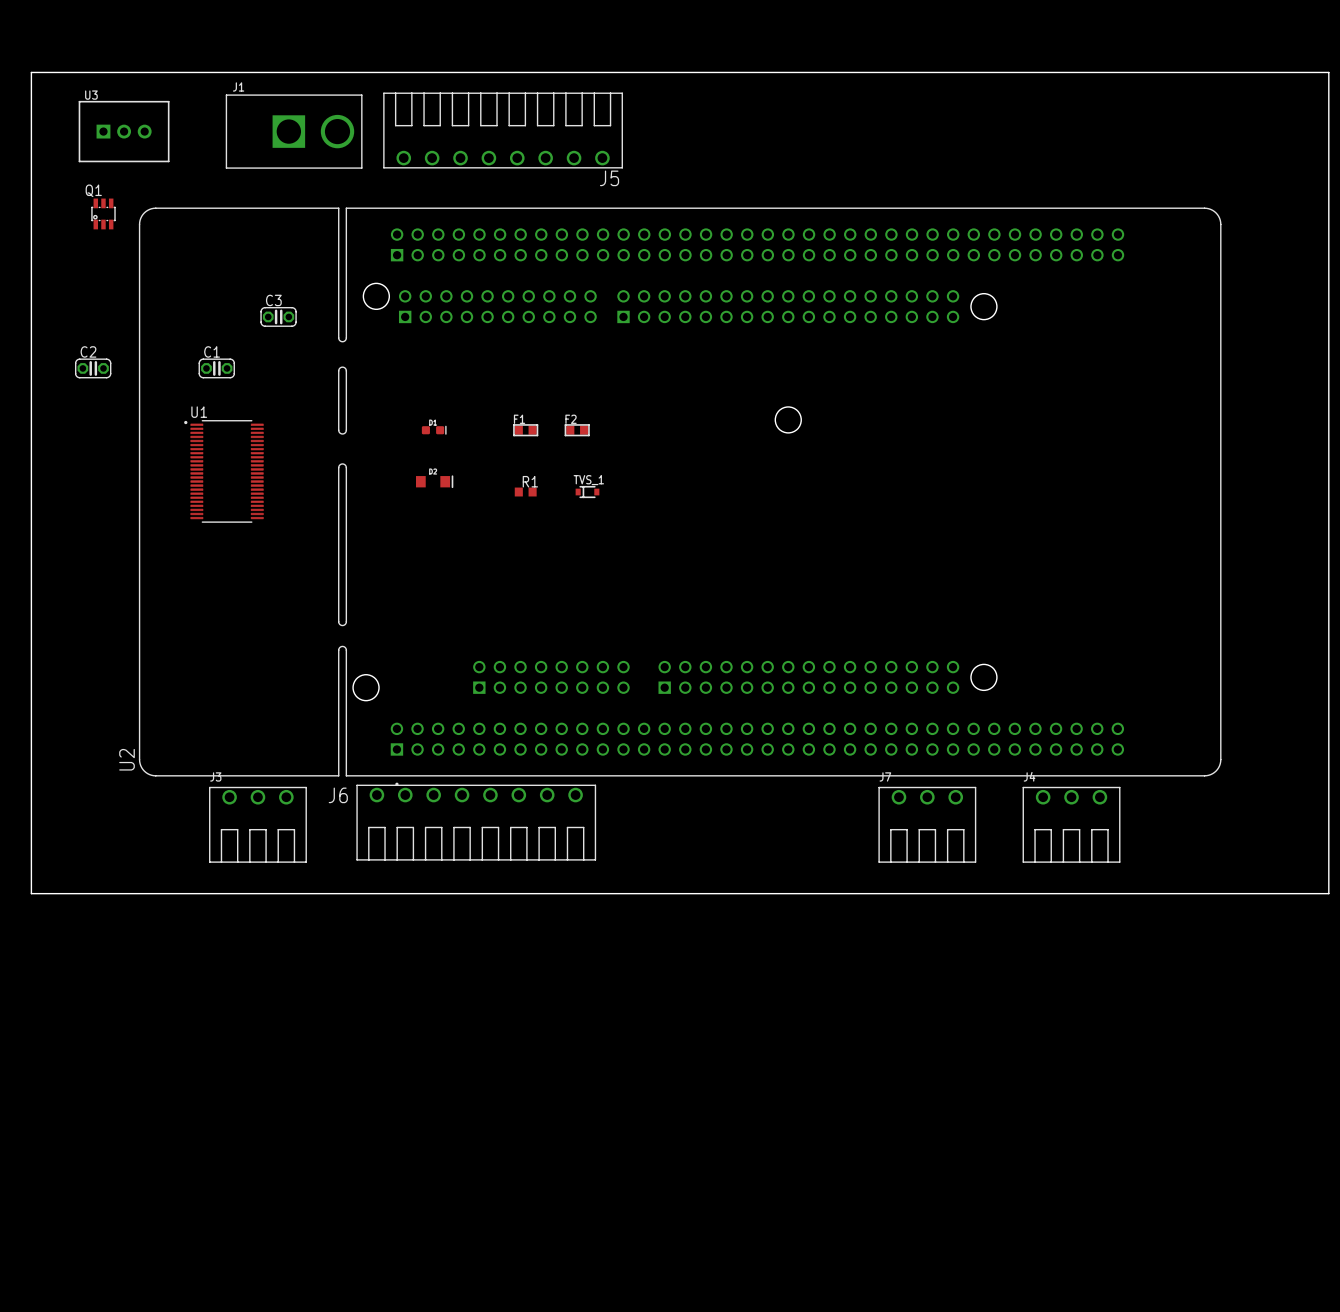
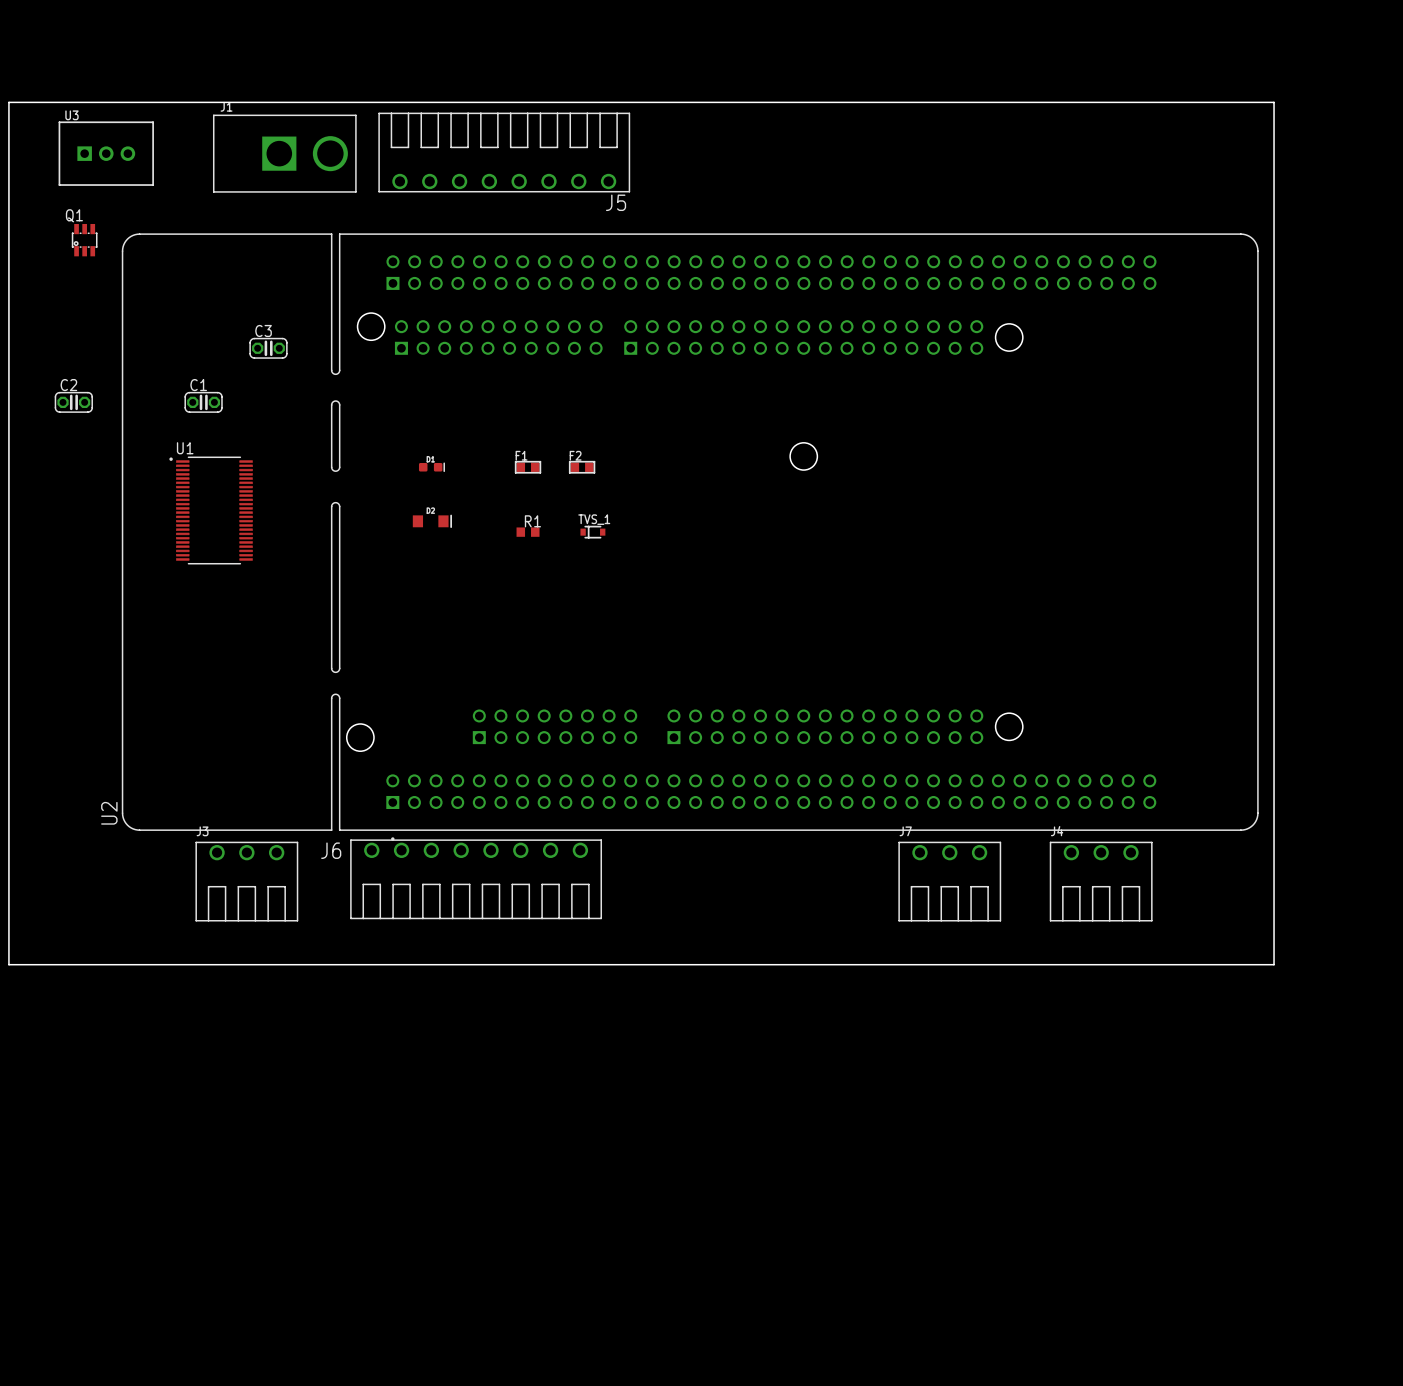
board edge: (31, 82) (31, 72) (1328, 72) (1328, 893) (31, 893) -> (8, 102) (1274, 102) (1274, 964) (8, 964) (8, 953)

